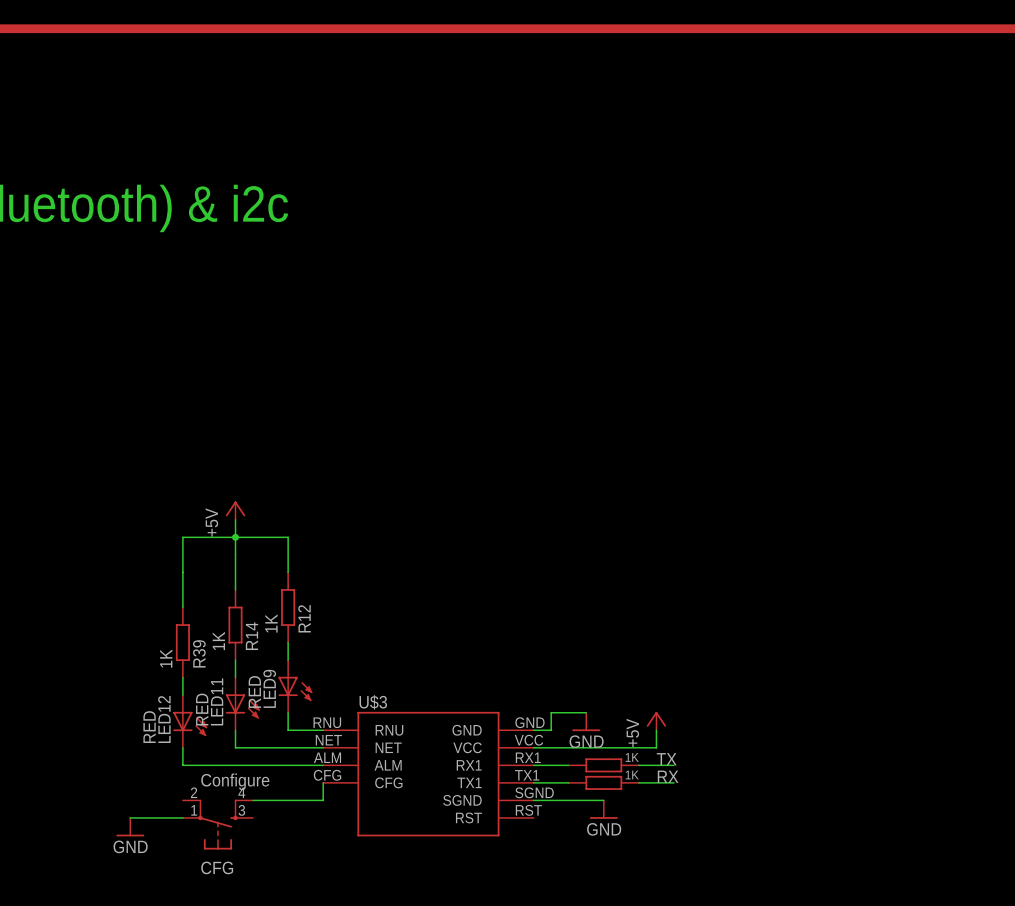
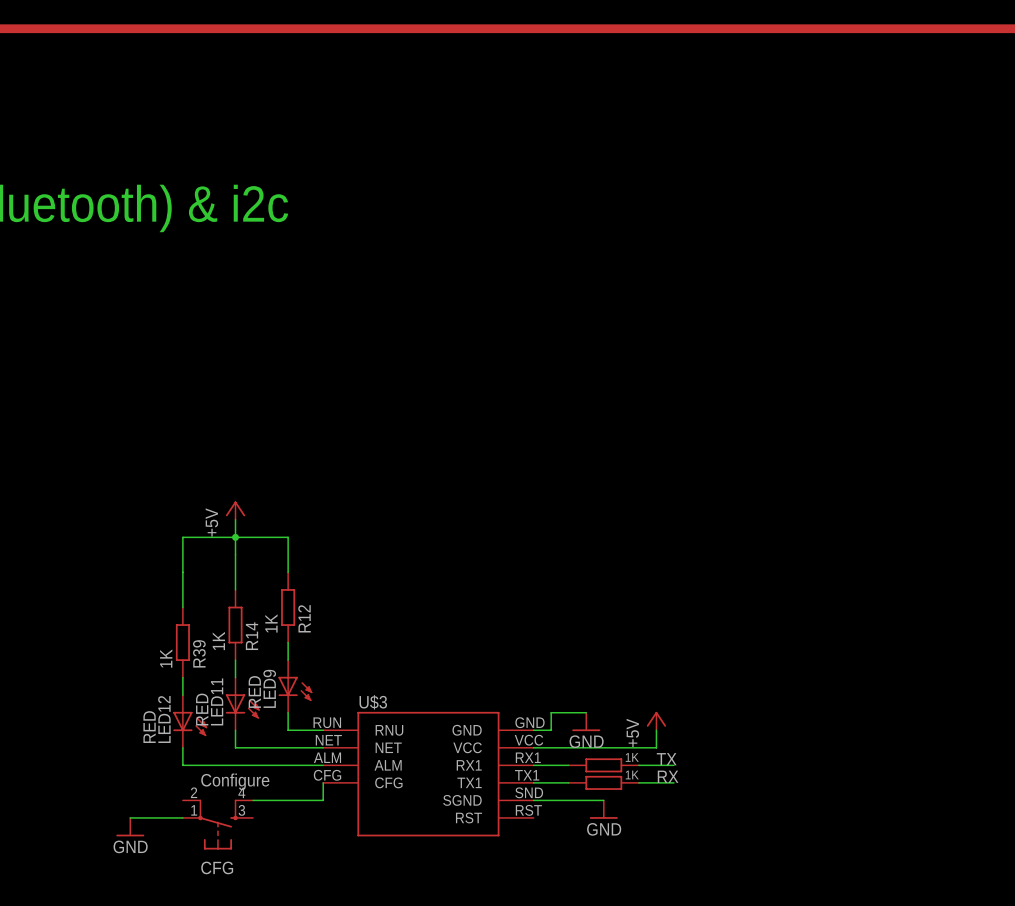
U$3 pin number: RNU (327, 722) -> RUN (327, 722)
U$3 pin number: SGND (534, 792) -> SND (529, 792)

